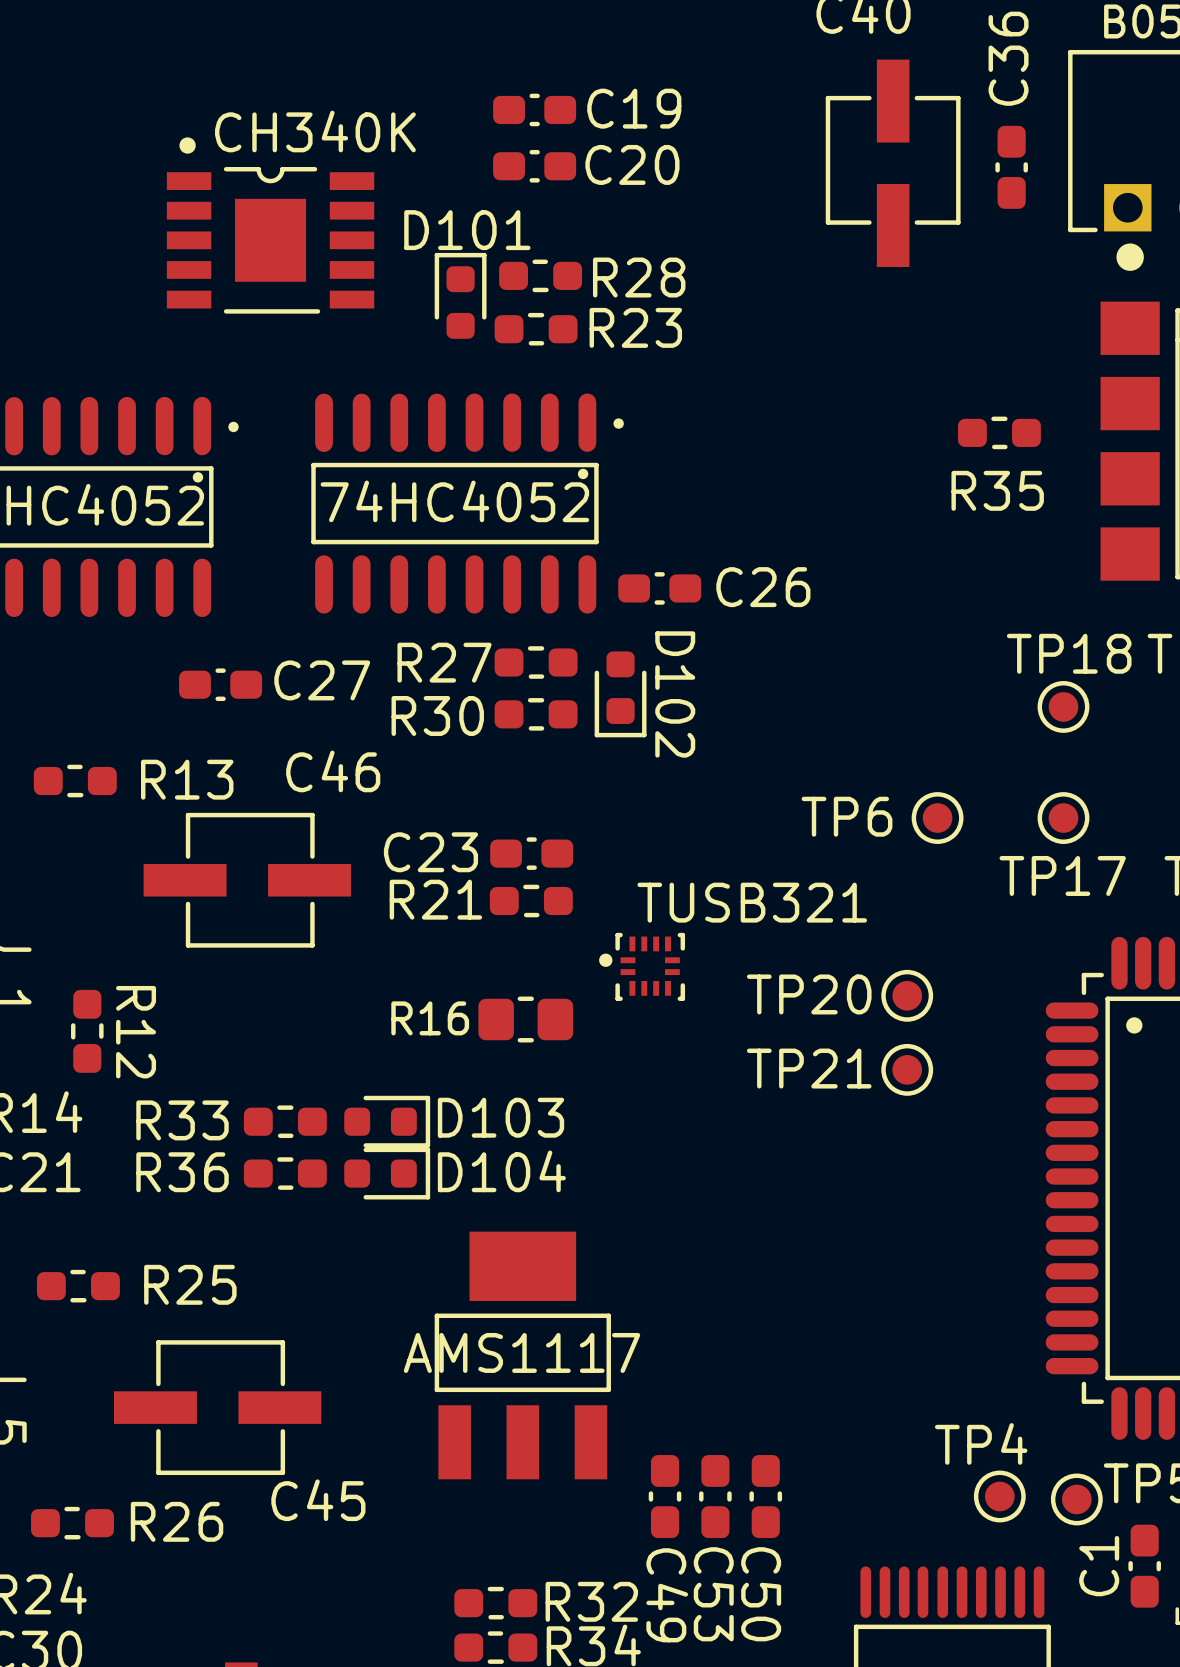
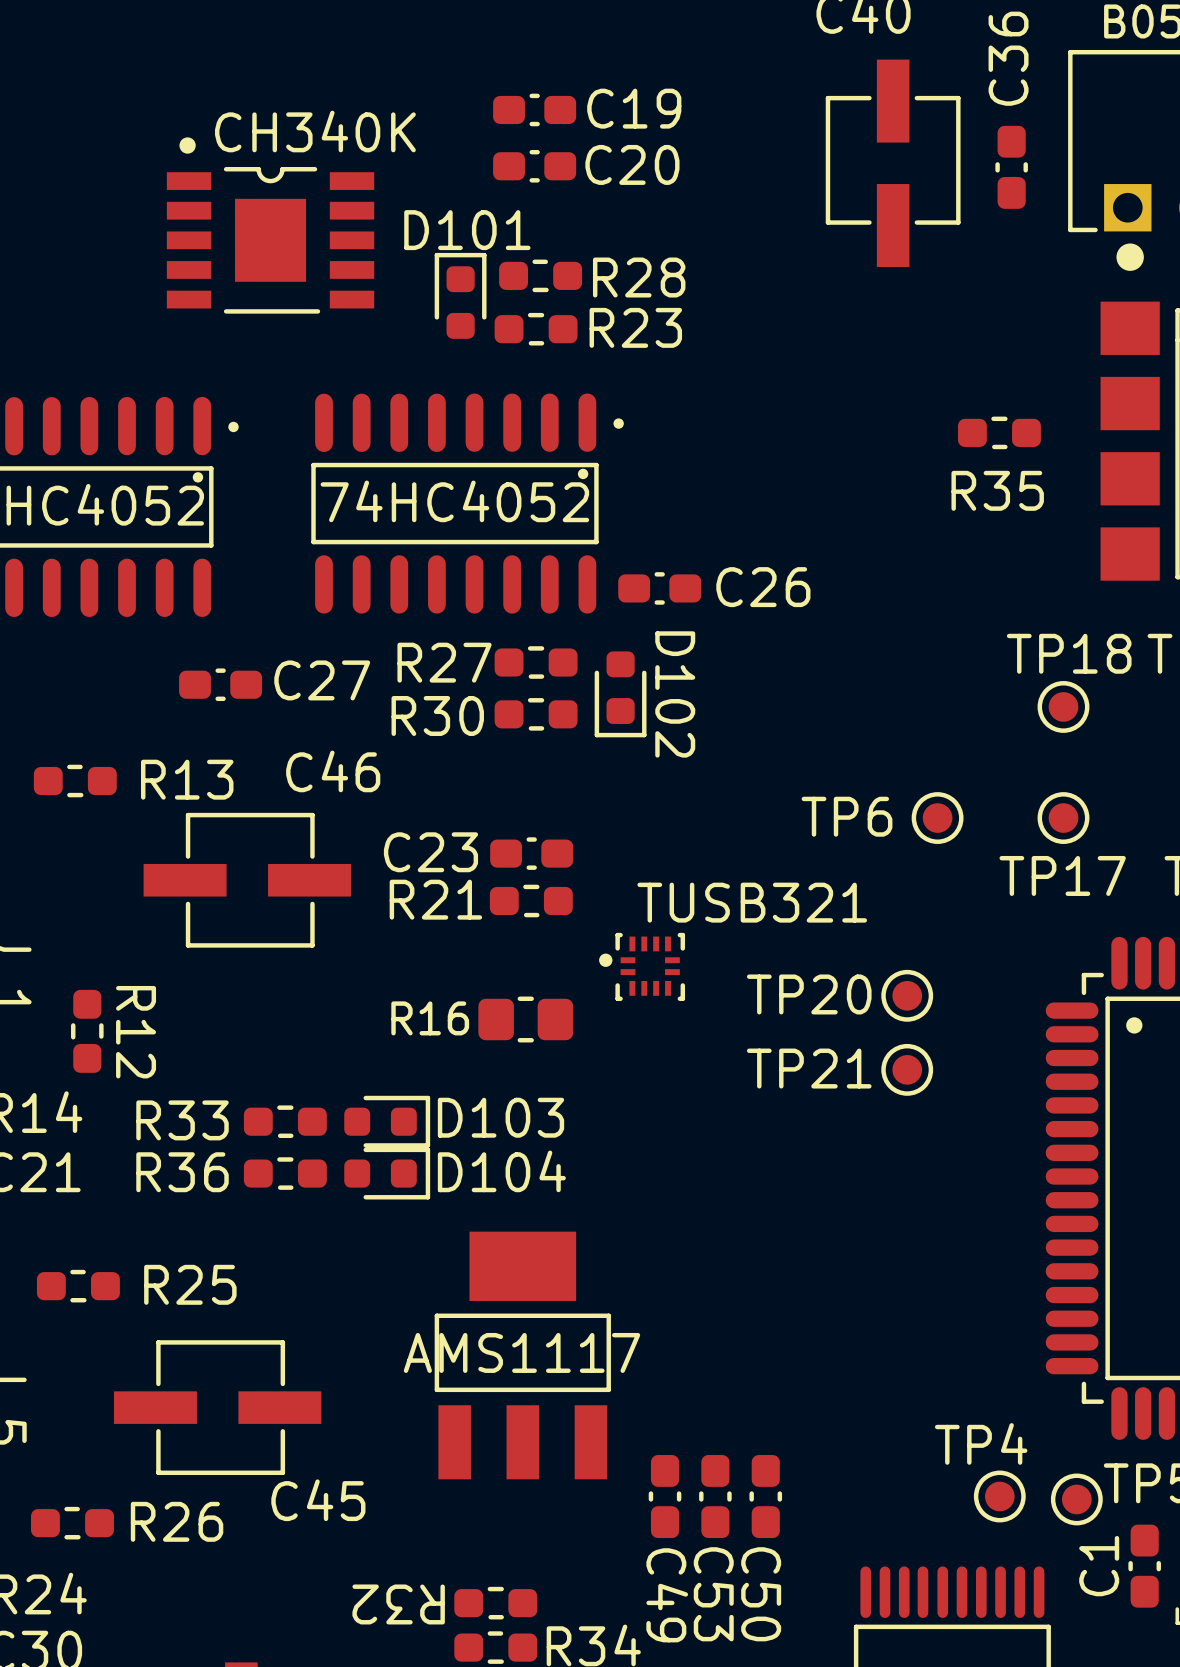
R32 name rotation: 0° (591, 1601) -> 180° (398, 1604)
R32 name position: R32 (591, 1601) -> R32 (398, 1604)

